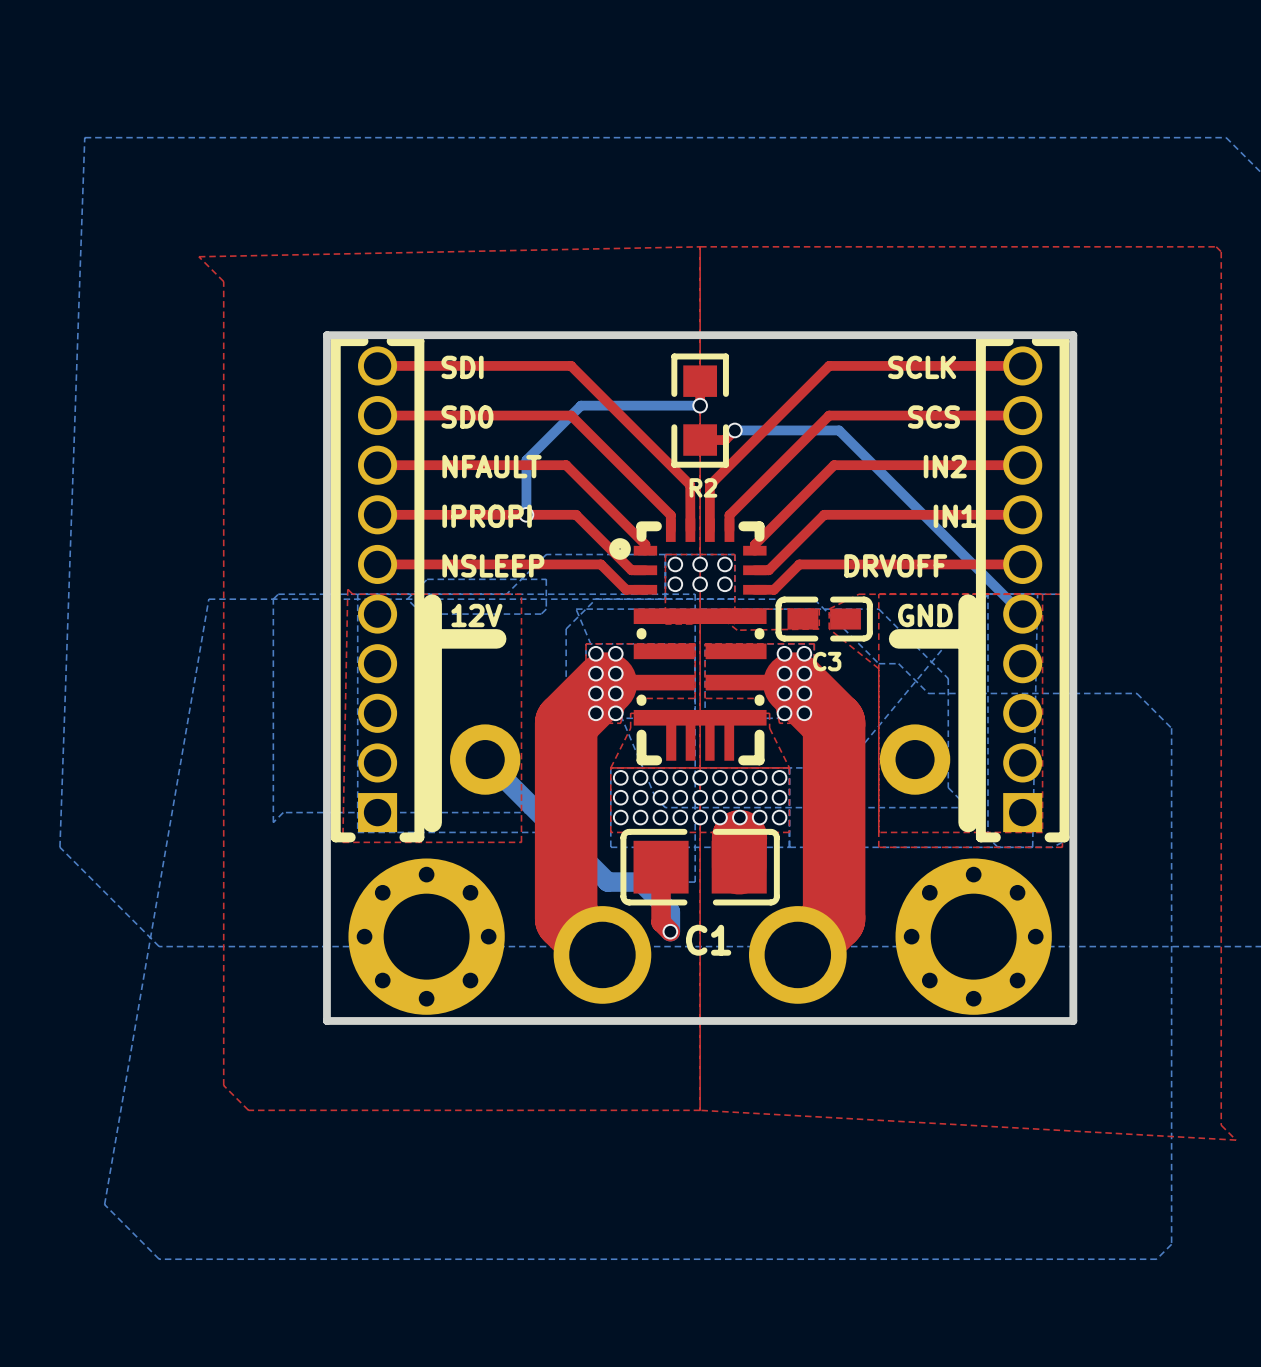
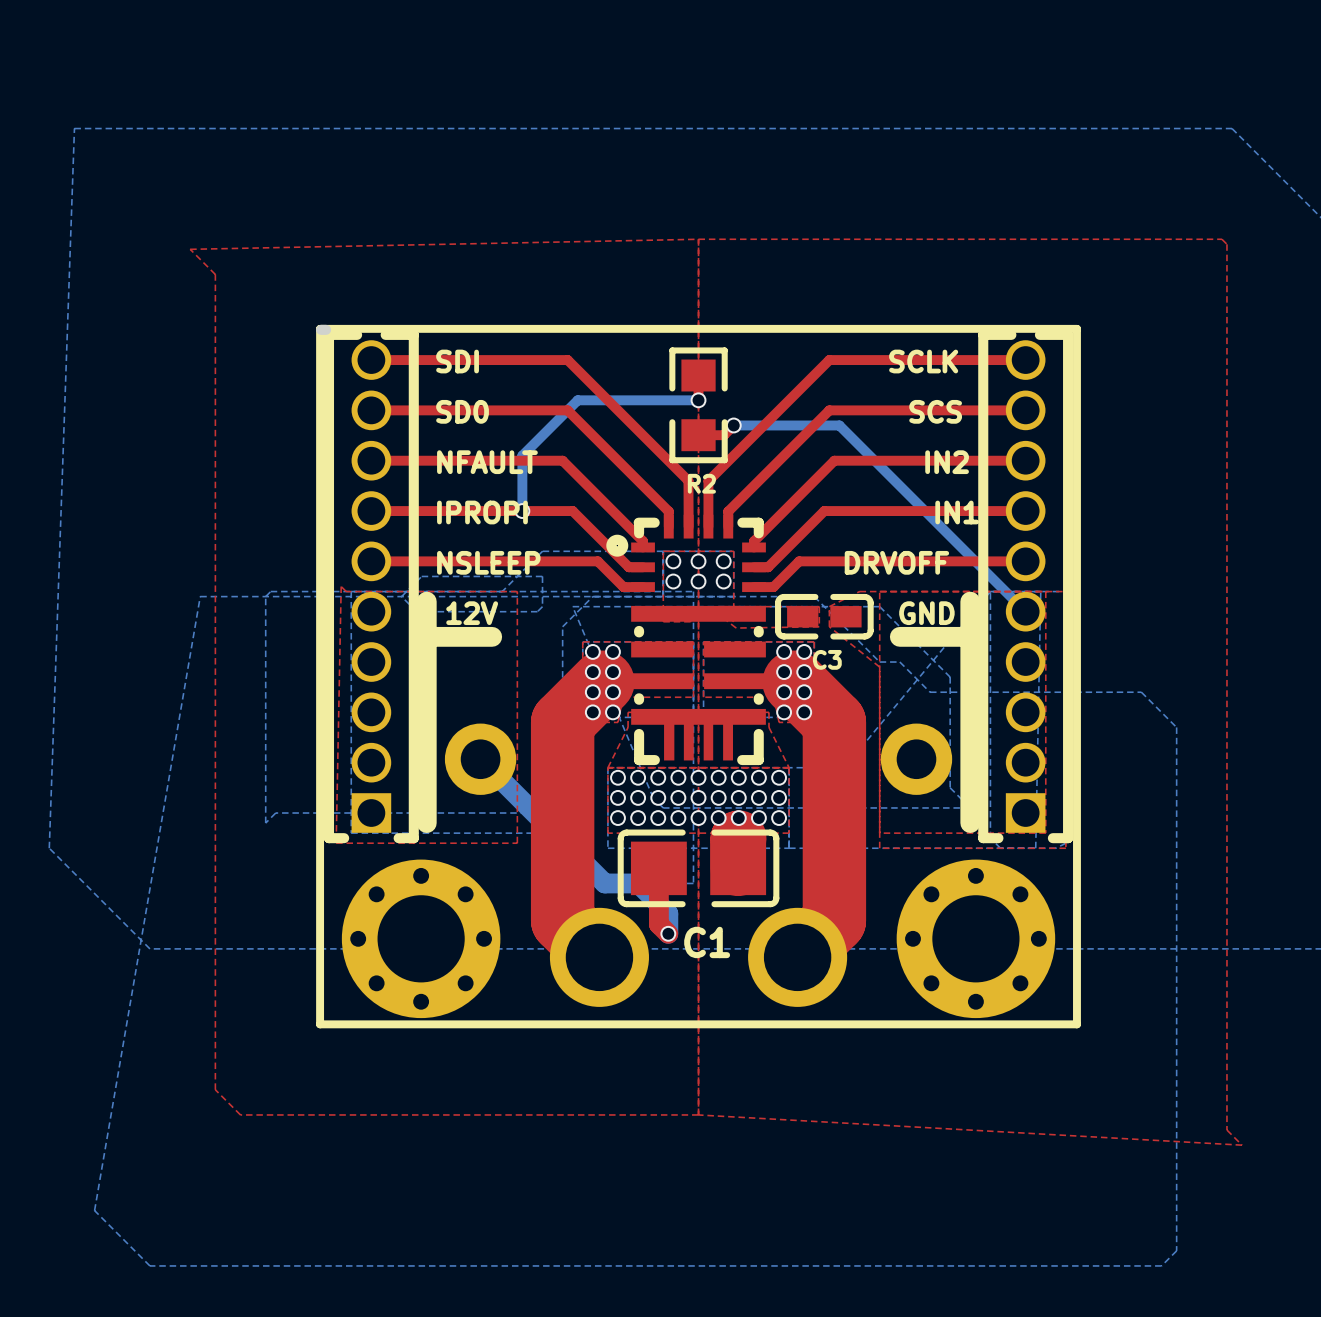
line: none -> (320, 328) (1076, 328) (1076, 1024) (320, 1024) (320, 328)
board edge: (326, 335) (1073, 335) (1073, 1020) (326, 1020) (326, 335) -> (321, 329) (326, 329)

